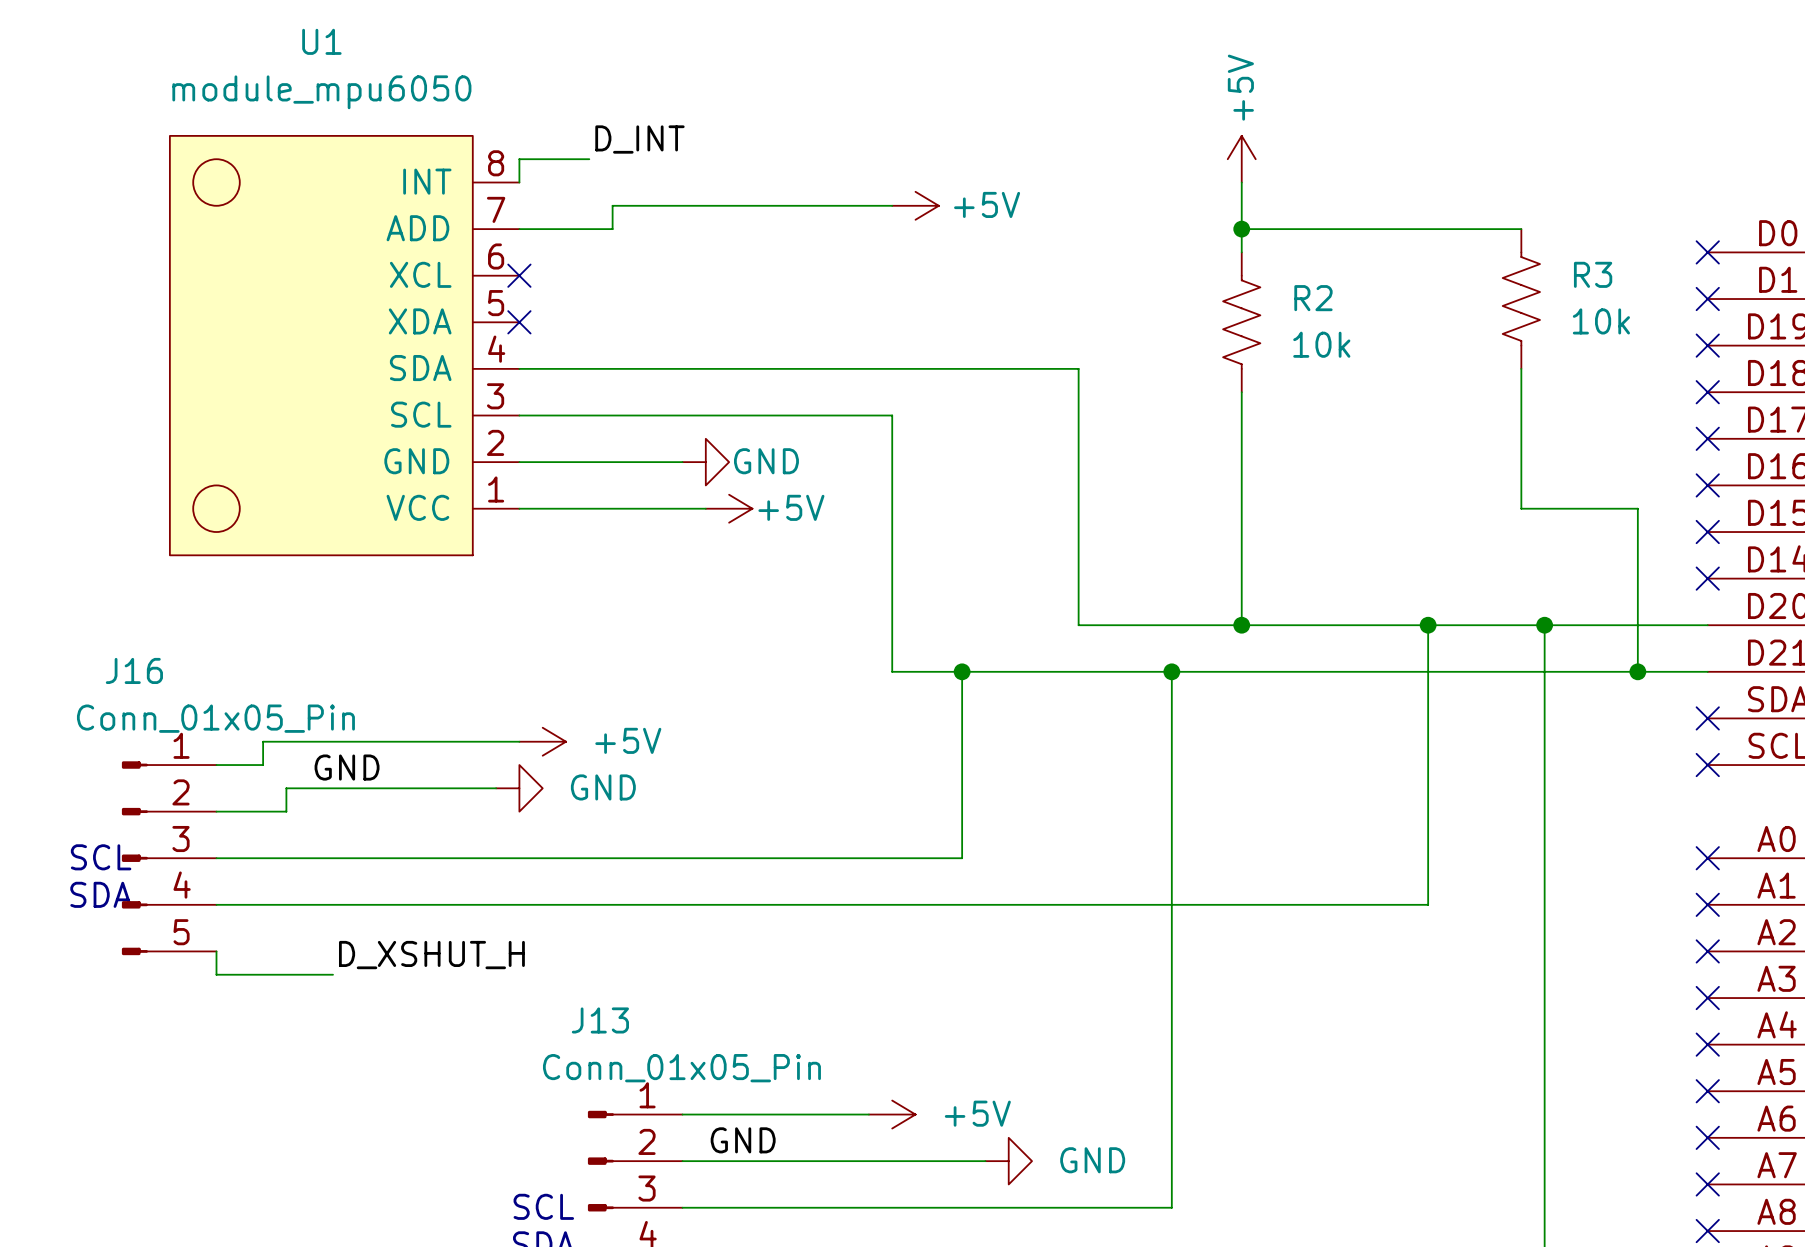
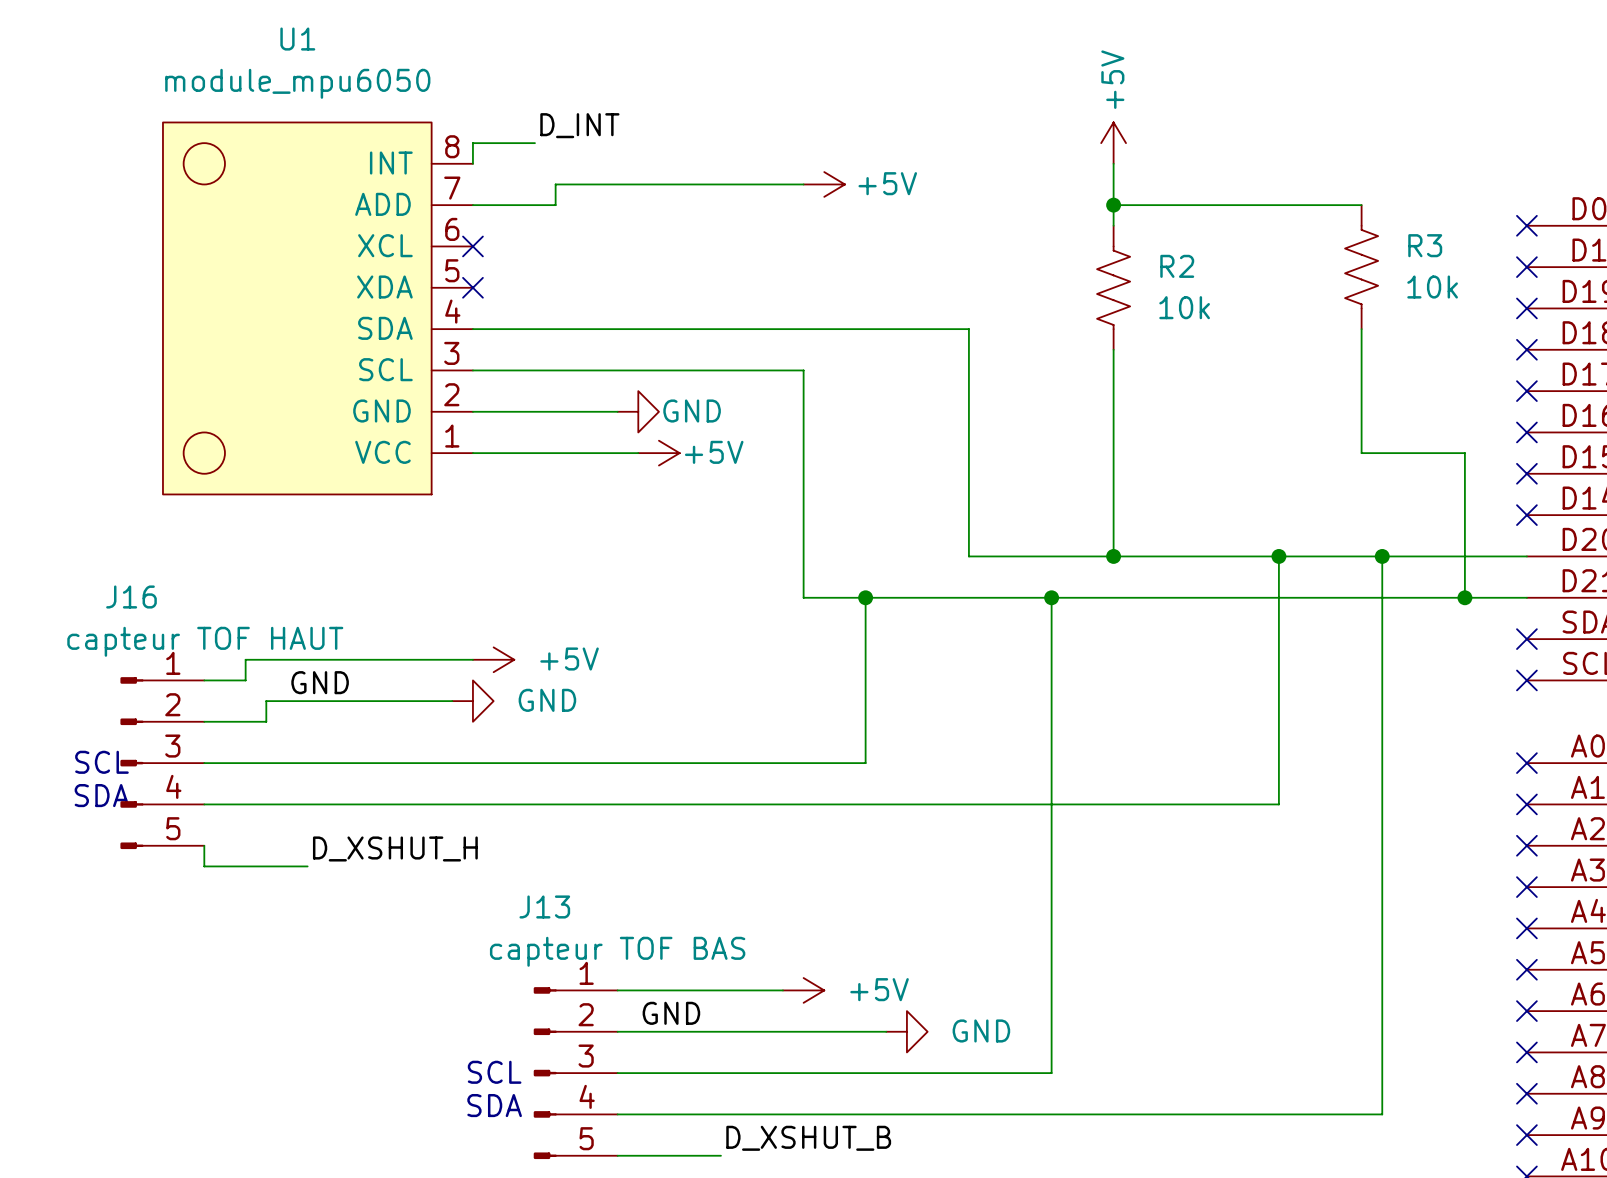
J16 value: Conn_01x05_Pin (215, 718) -> capteur TOF HAUT (205, 641)
J13 value: Conn_01x05_Pin (681, 1068) -> capteur TOF BAS (617, 951)

